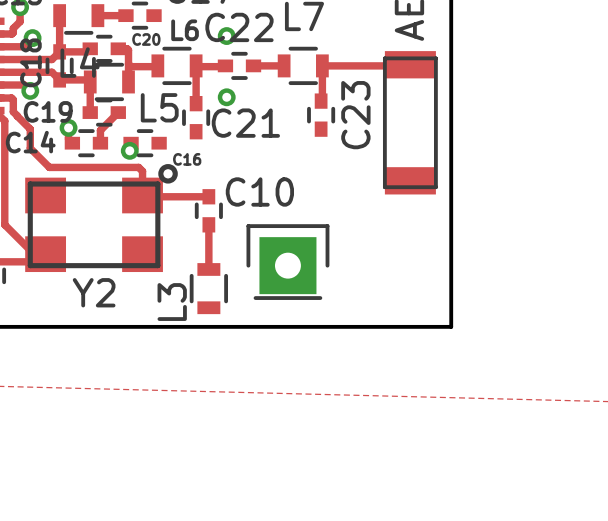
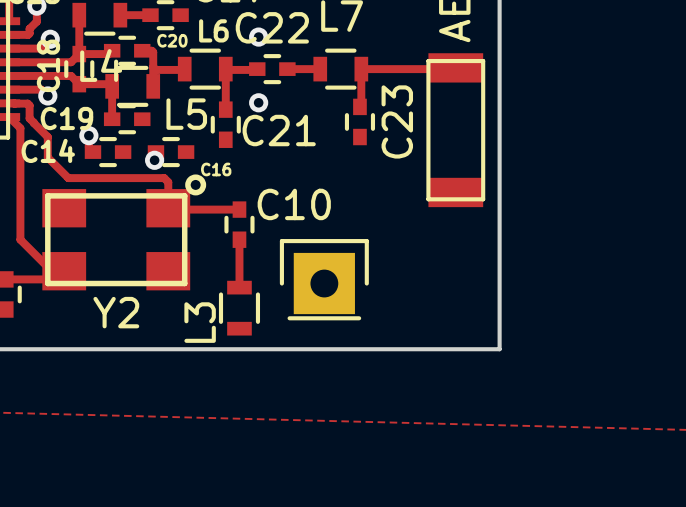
track: (118, 112) (100, 130) (100, 143) -> none

